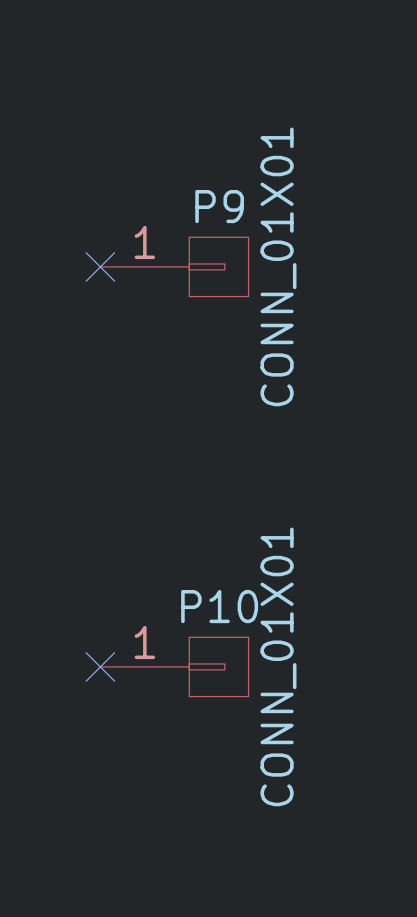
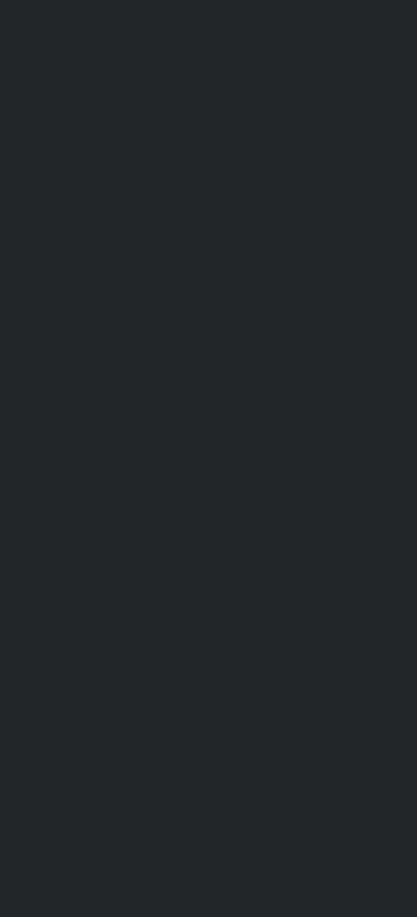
no-connect mark: (100, 266) -> none
P9: CONN_01X01 (174, 266) -> none
no-connect mark: (100, 666) -> none
P10: CONN_01X01 (174, 666) -> none

